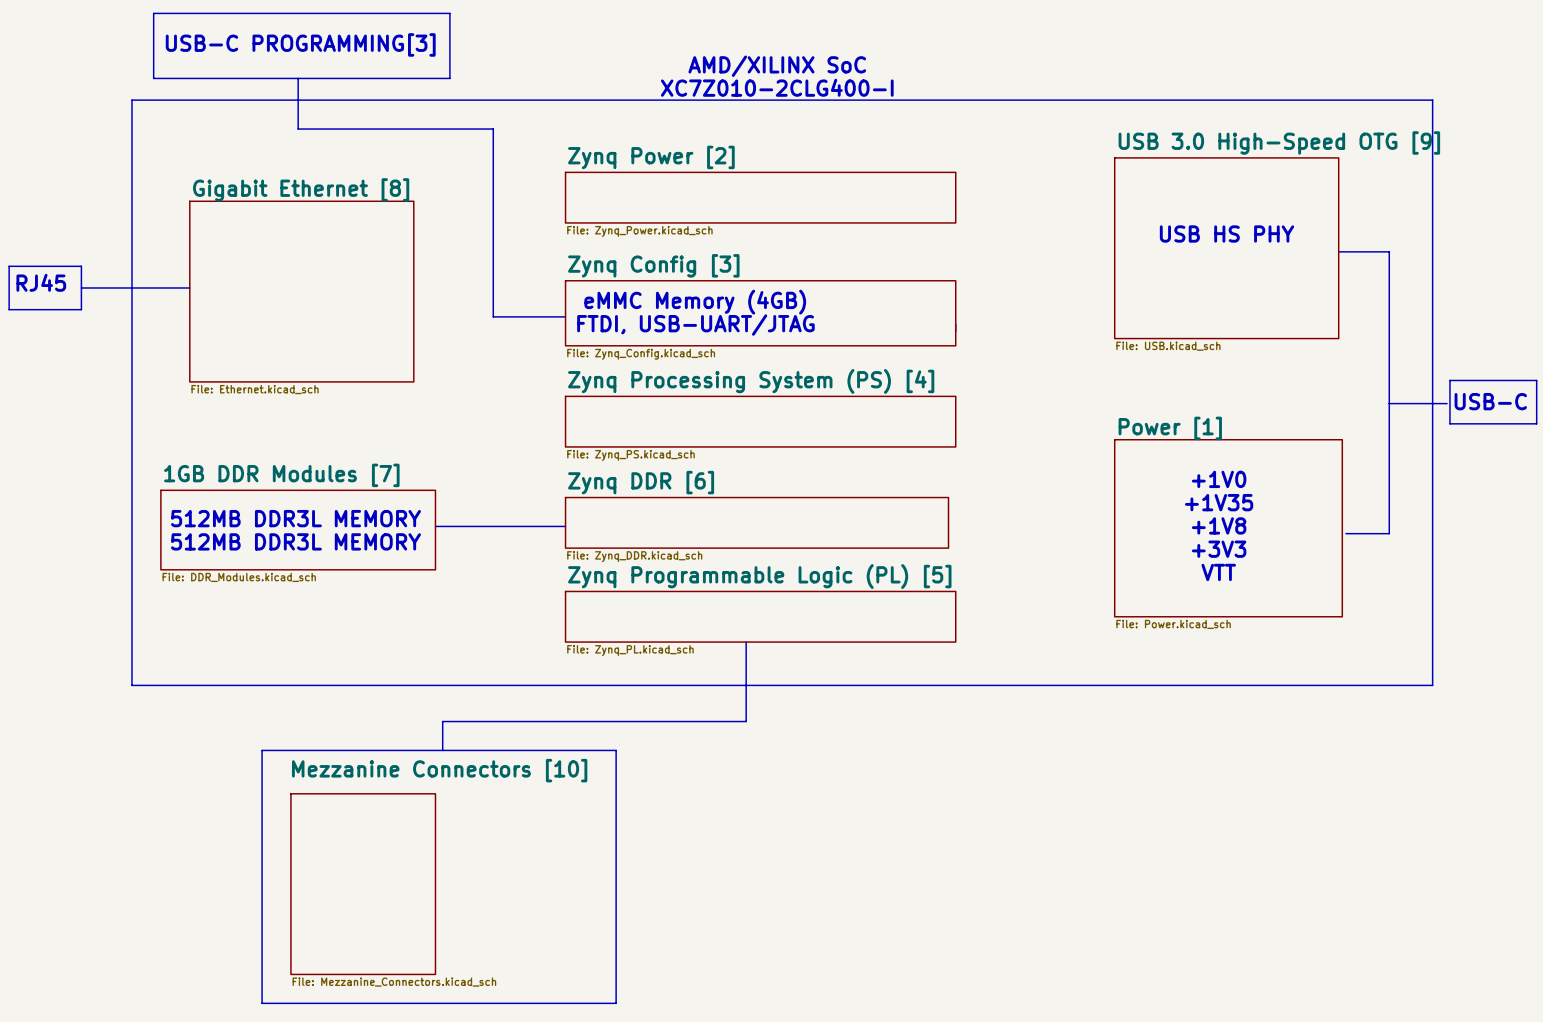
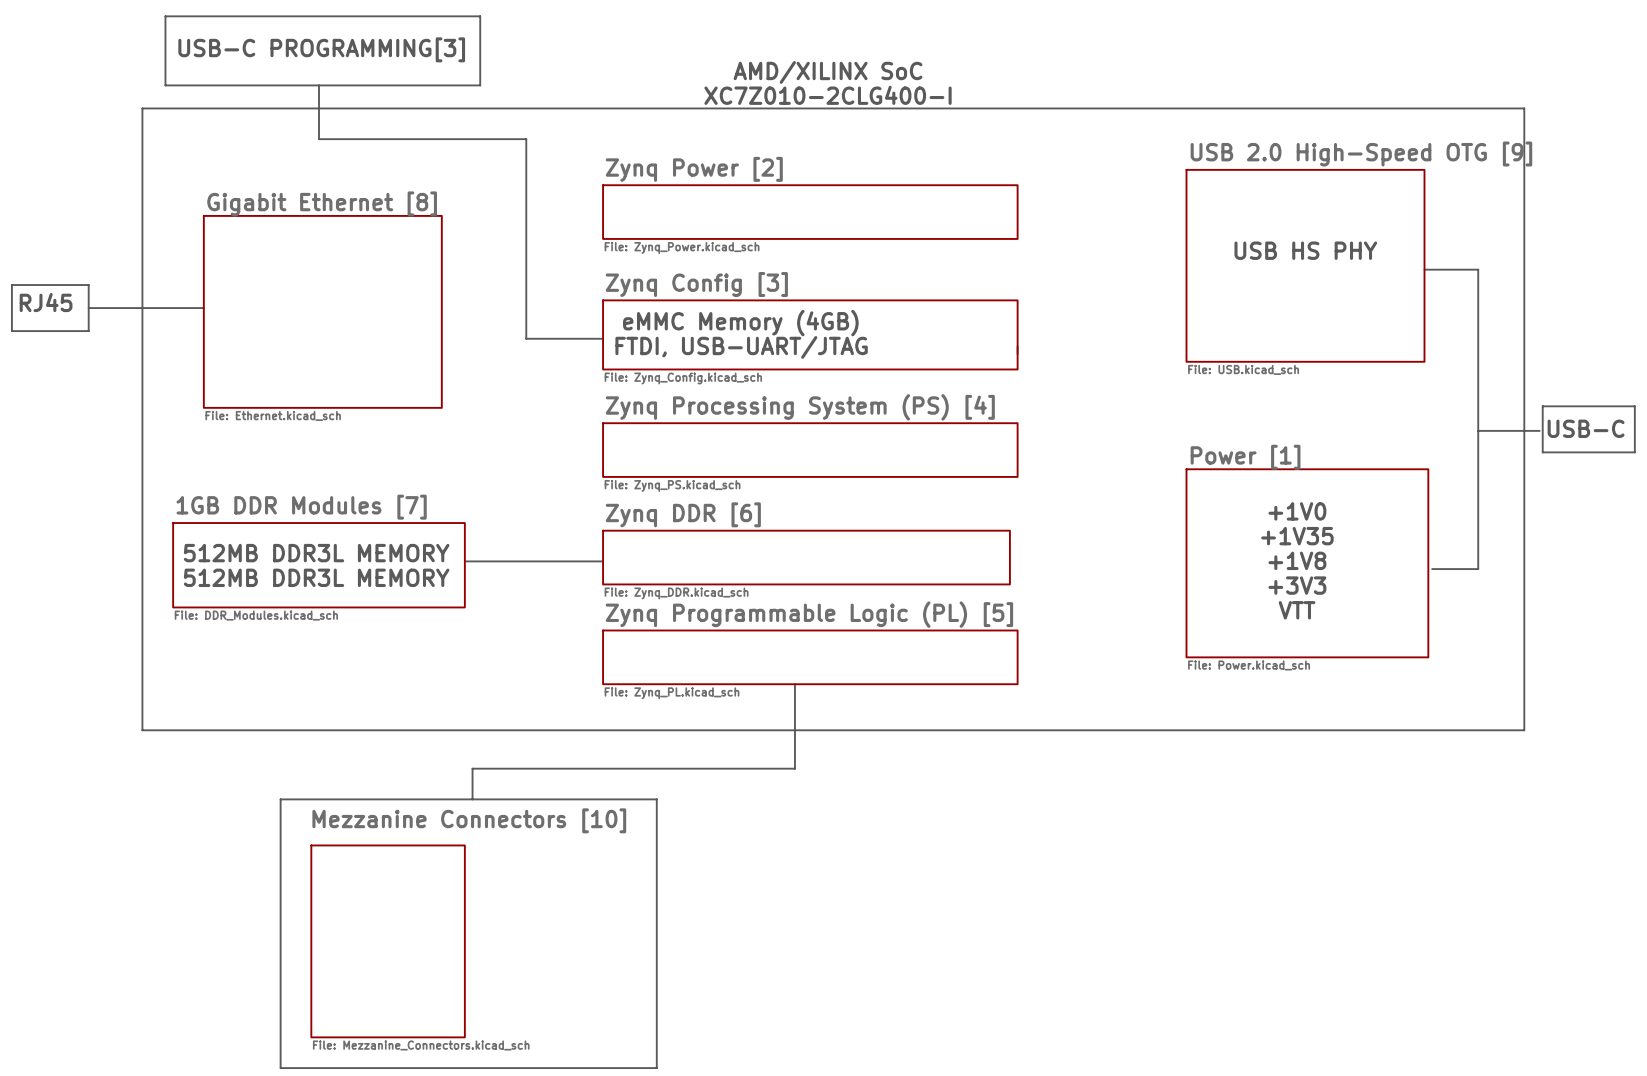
sheet USB 3.0 High-Speed OTG [9] name: USB 3.0 High-Speed OTG [9] (1279, 142) -> USB 2.0 High-Speed OTG [9] (1361, 154)

